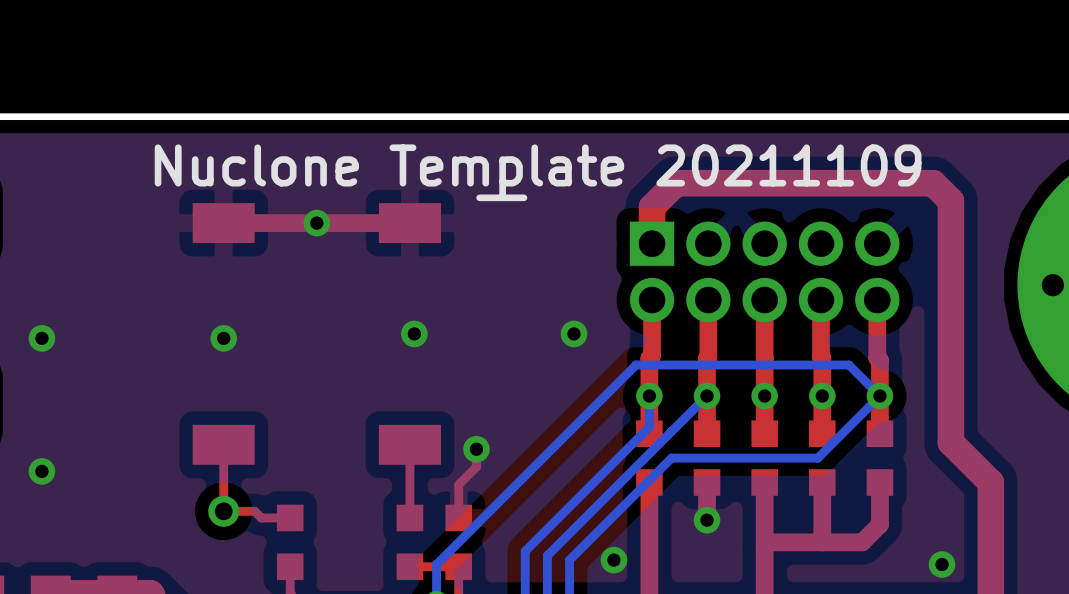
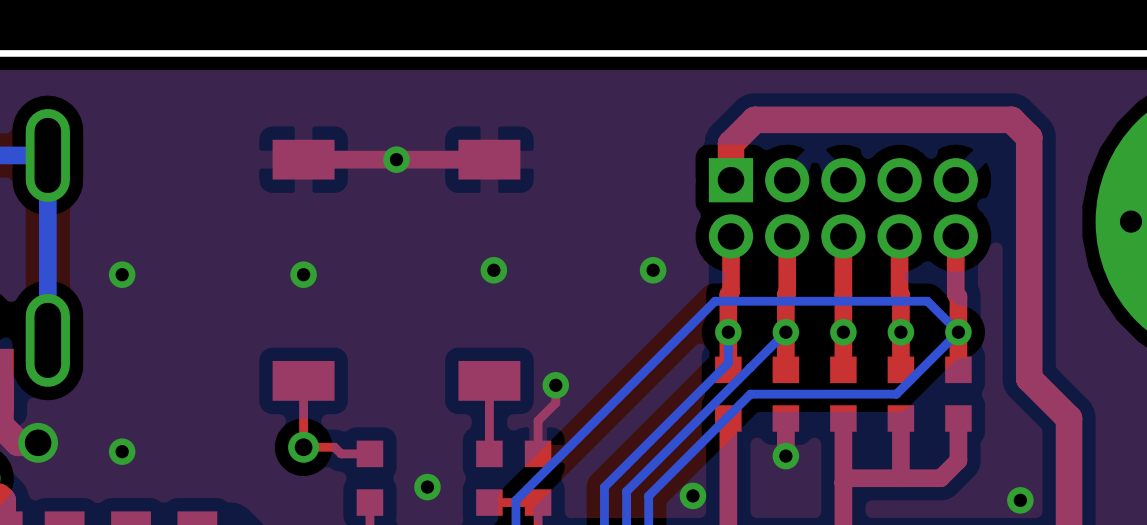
drawing: [476, 194, 528, 202] -> none
via position: (41, 471) -> (122, 451)
via: none -> (427, 487)

